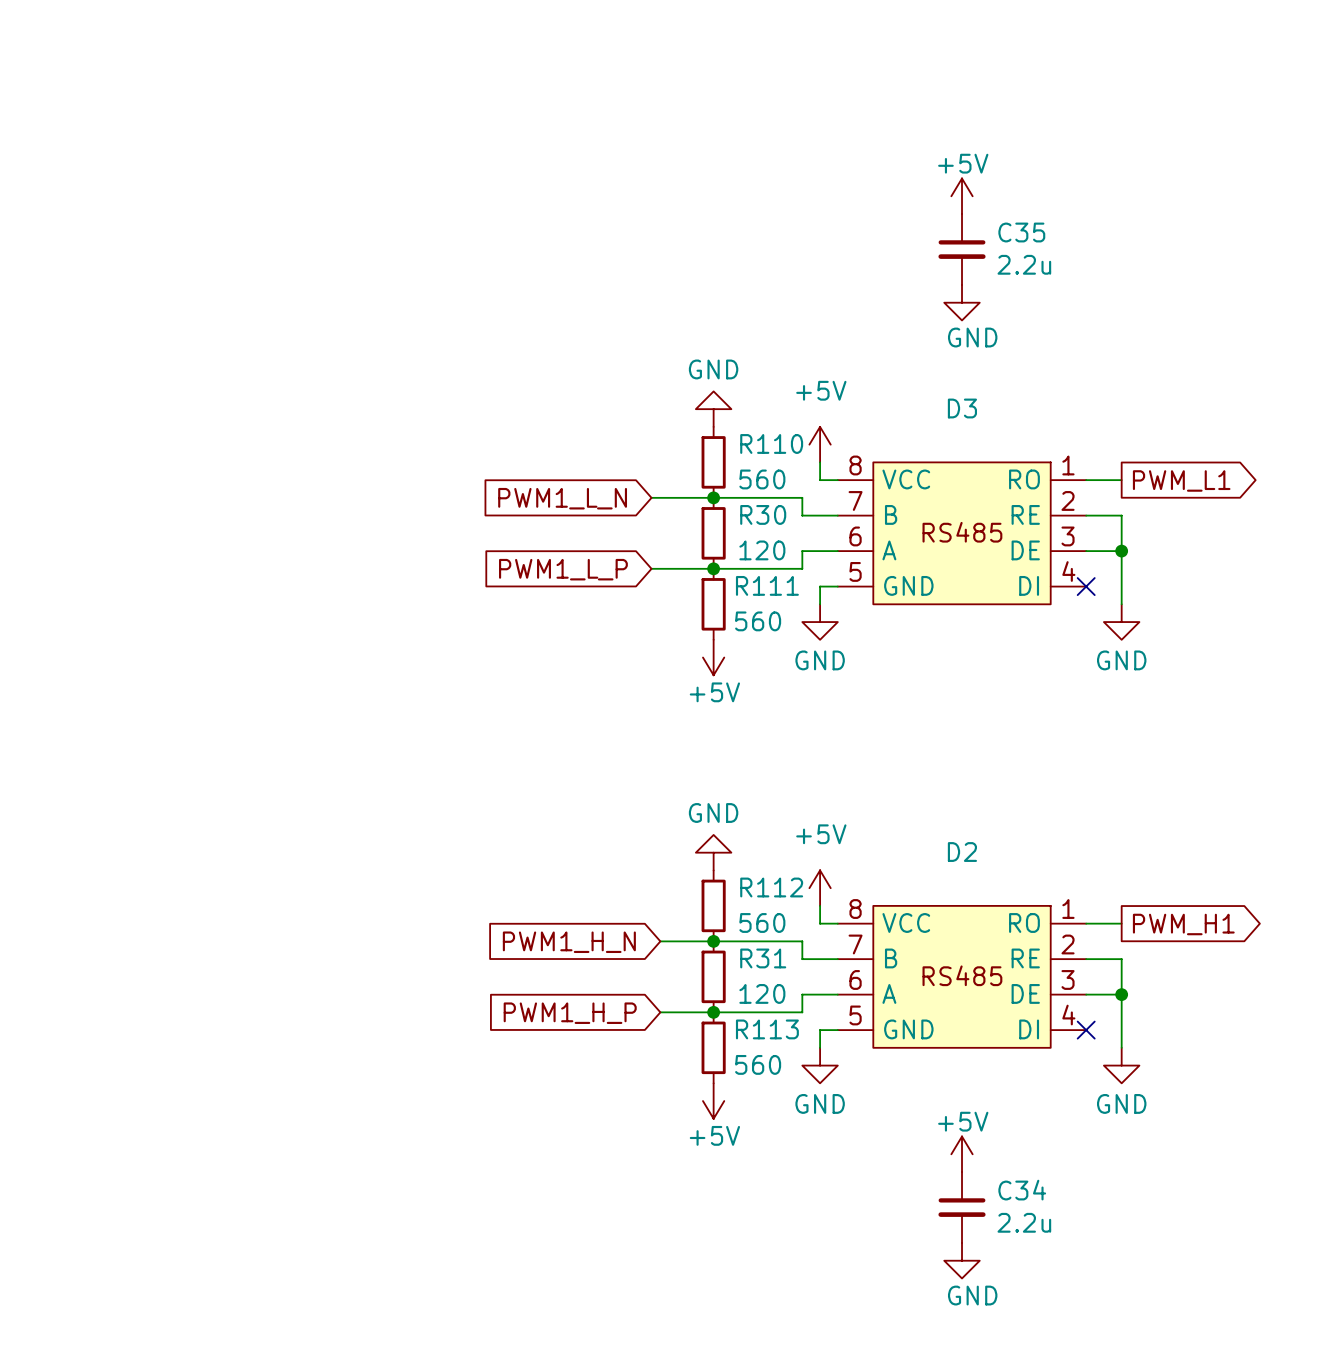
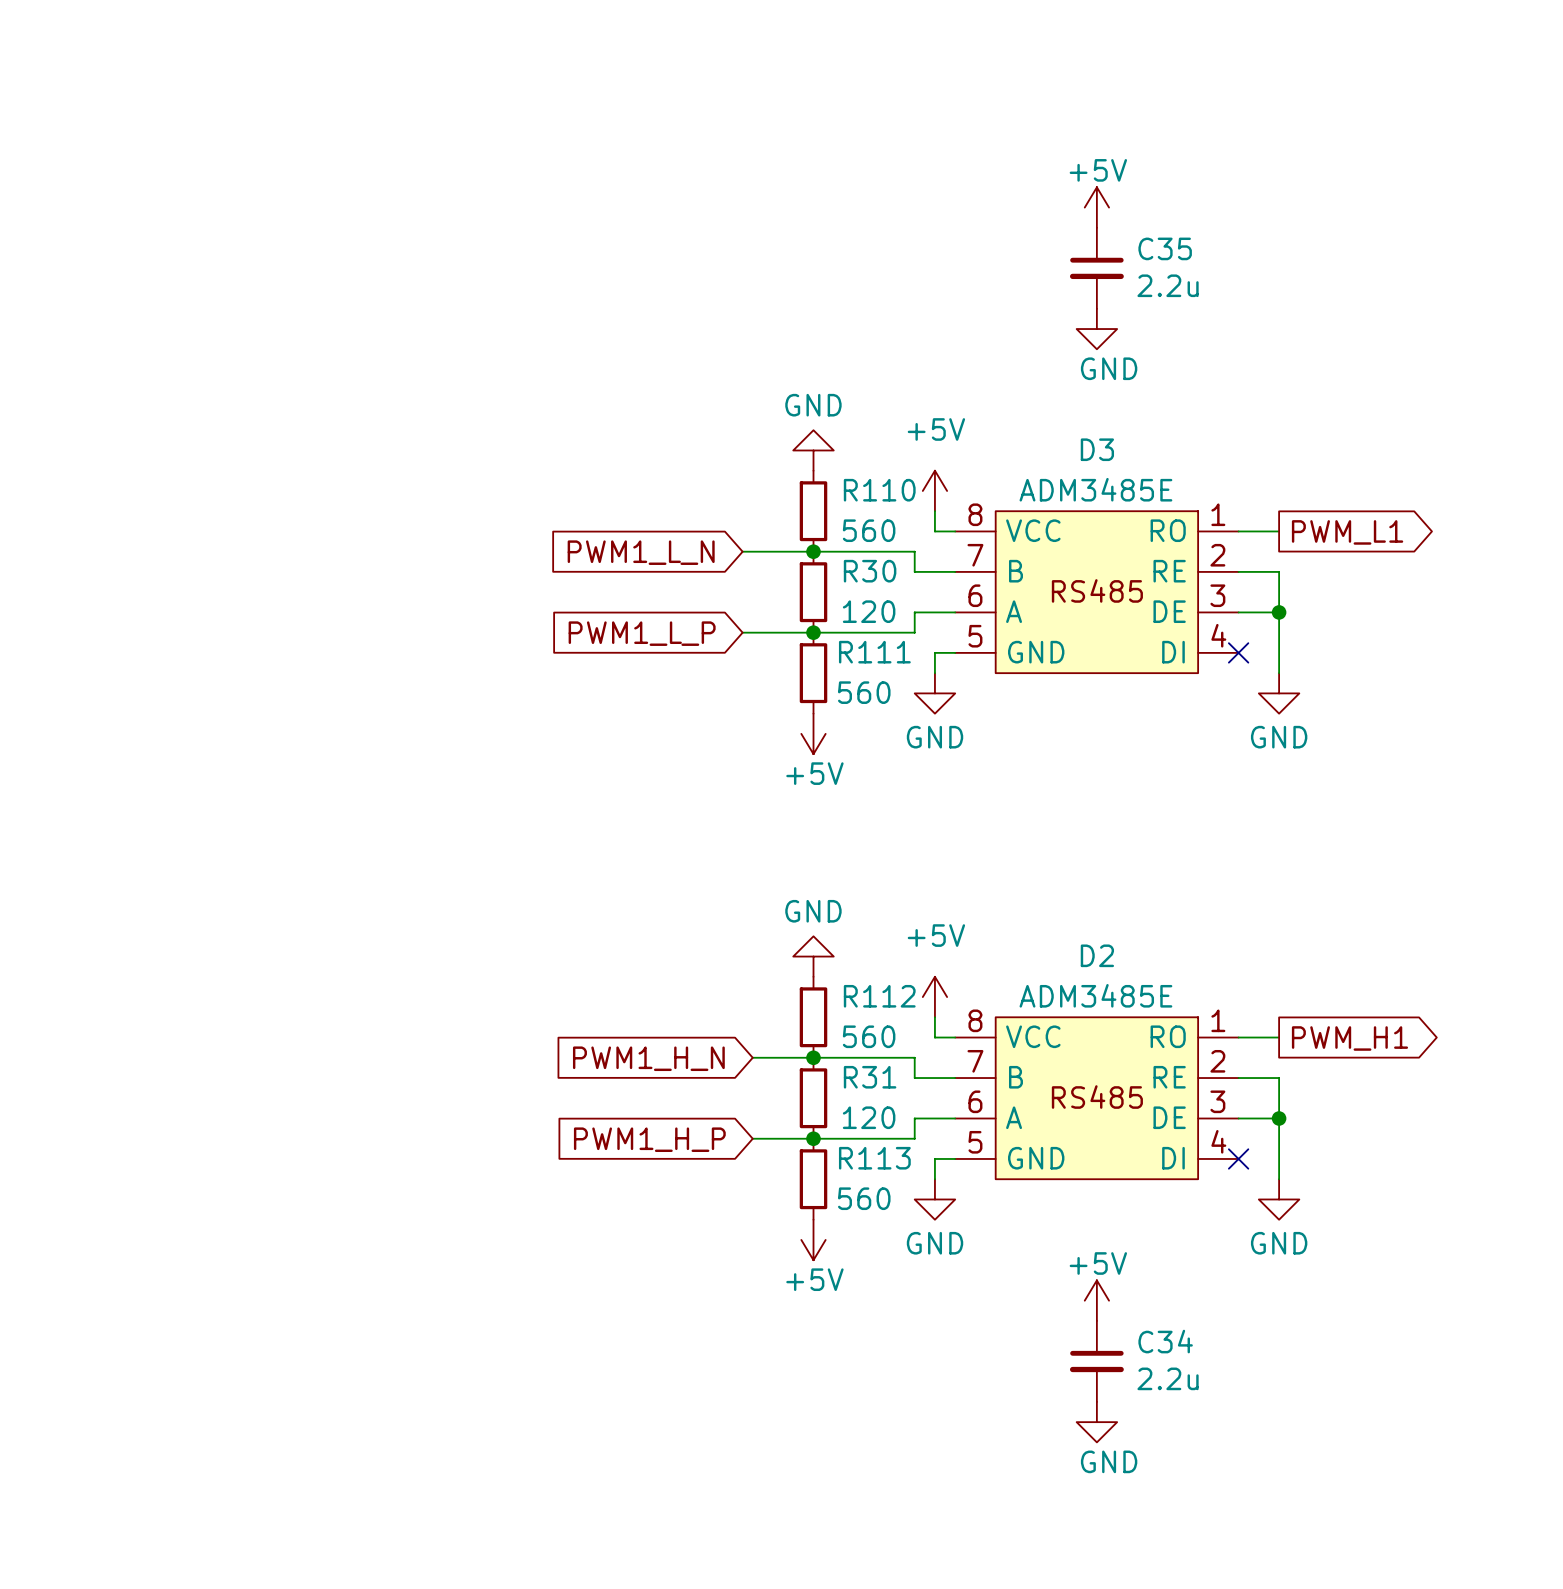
D3 value: none -> ADM3485E (1095, 489)
D2 value: none -> ADM3485E (1095, 995)

